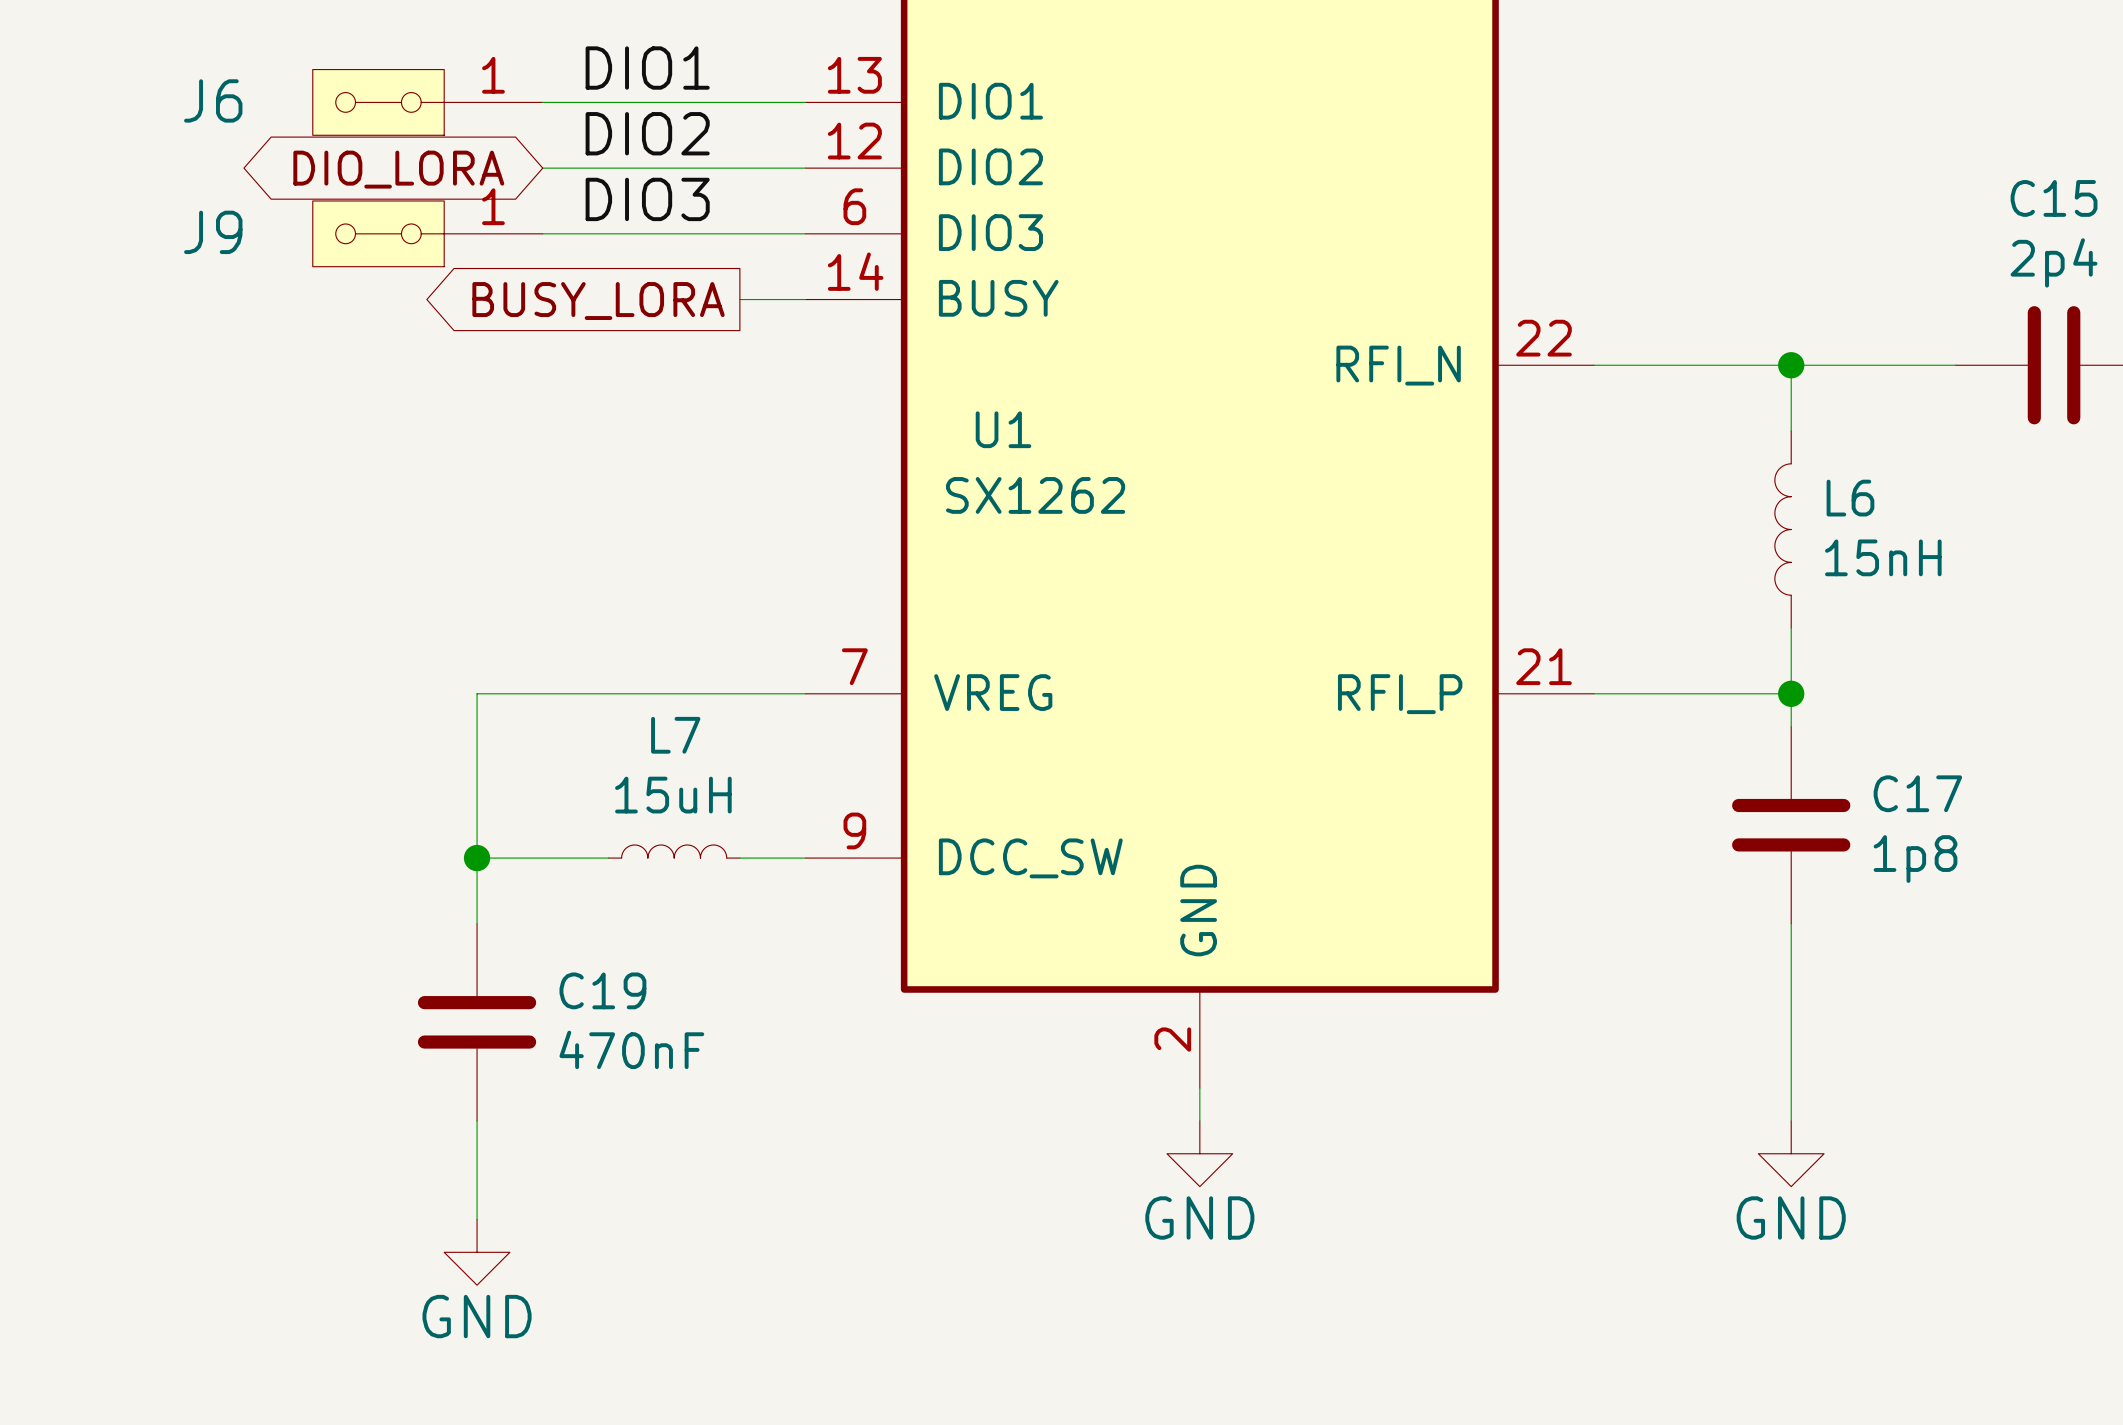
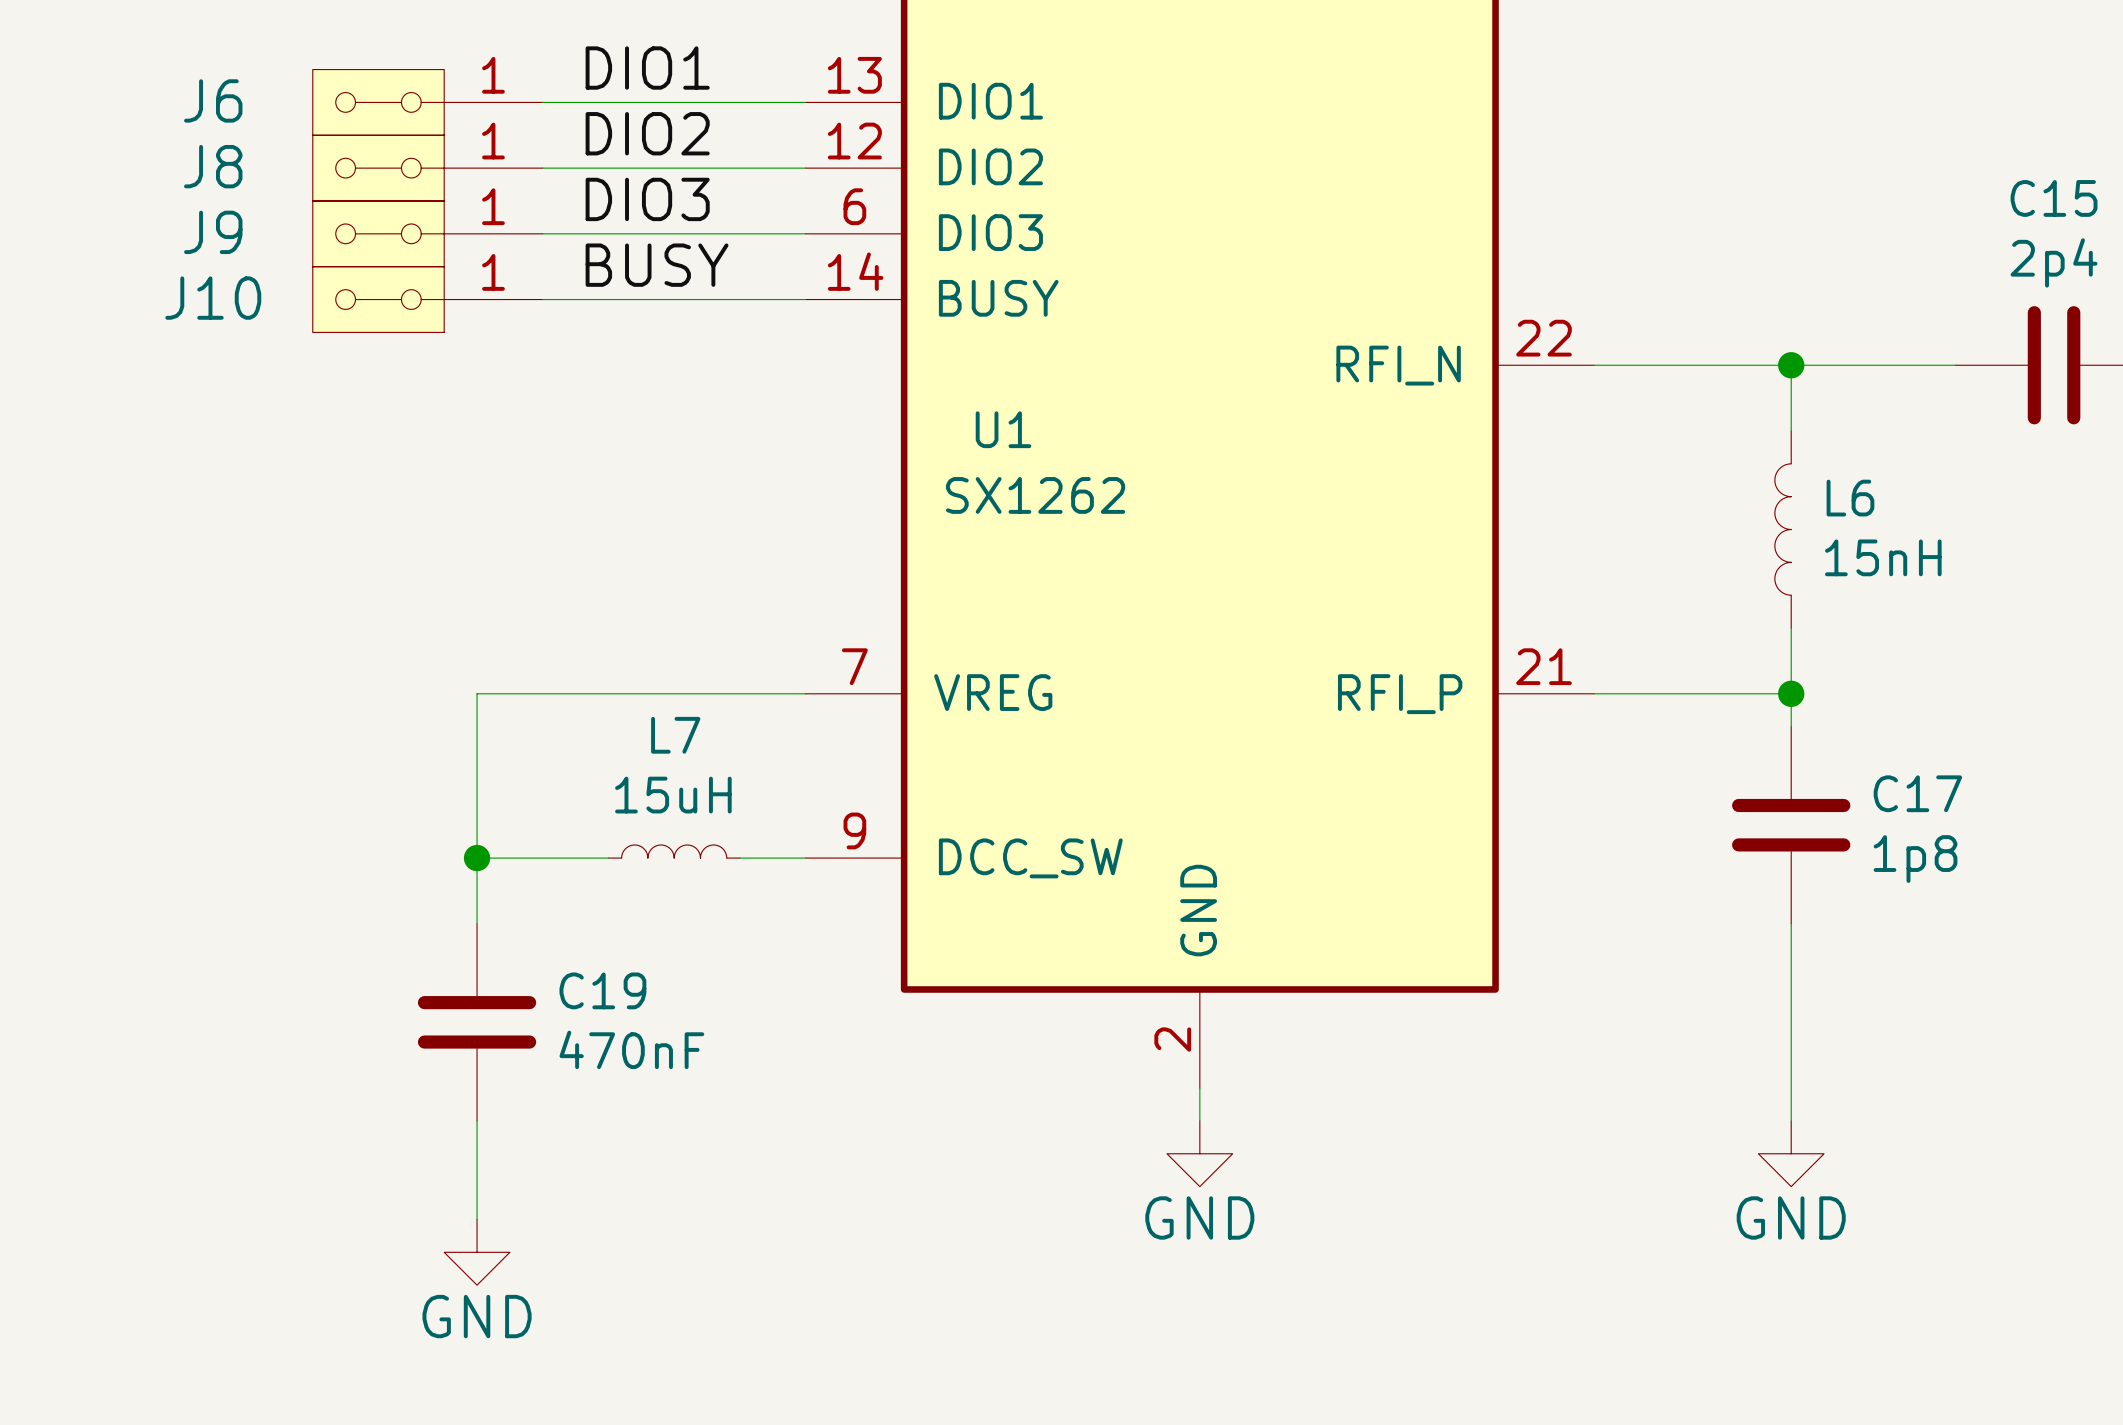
J8: none -> (427, 168)
global label: DIO_LORA (398, 169) -> none
label: none -> BUSY (657, 265)
J10: none -> (427, 299)
wire: none -> (542, 299) (739, 299)
global label: BUSY_LORA (598, 301) -> none

